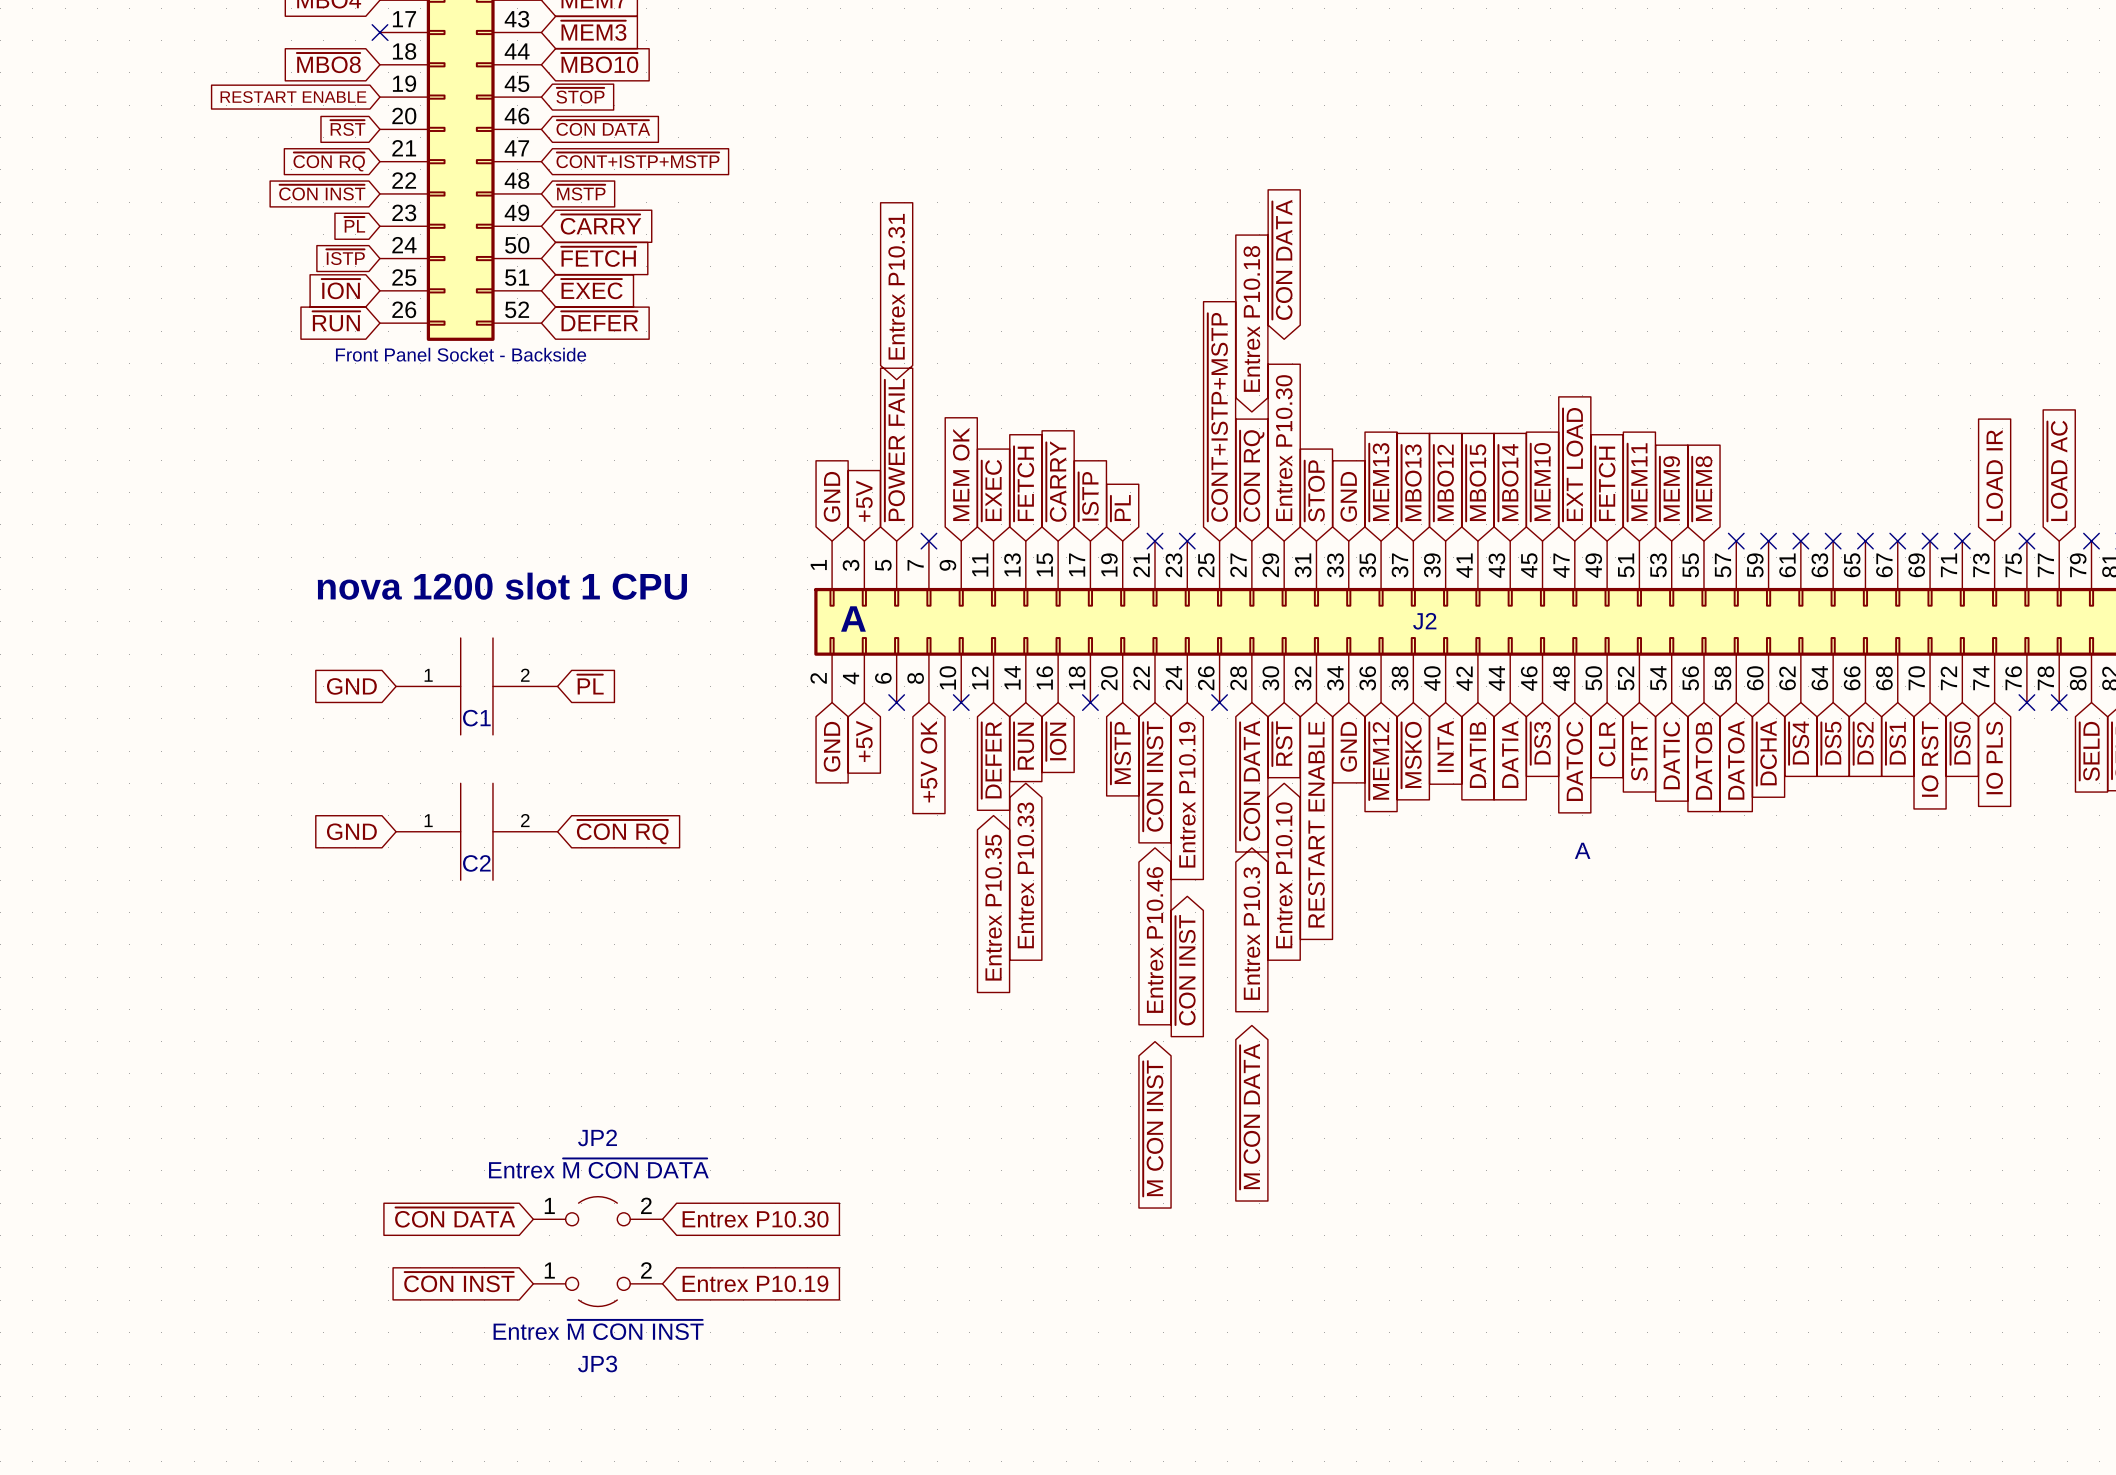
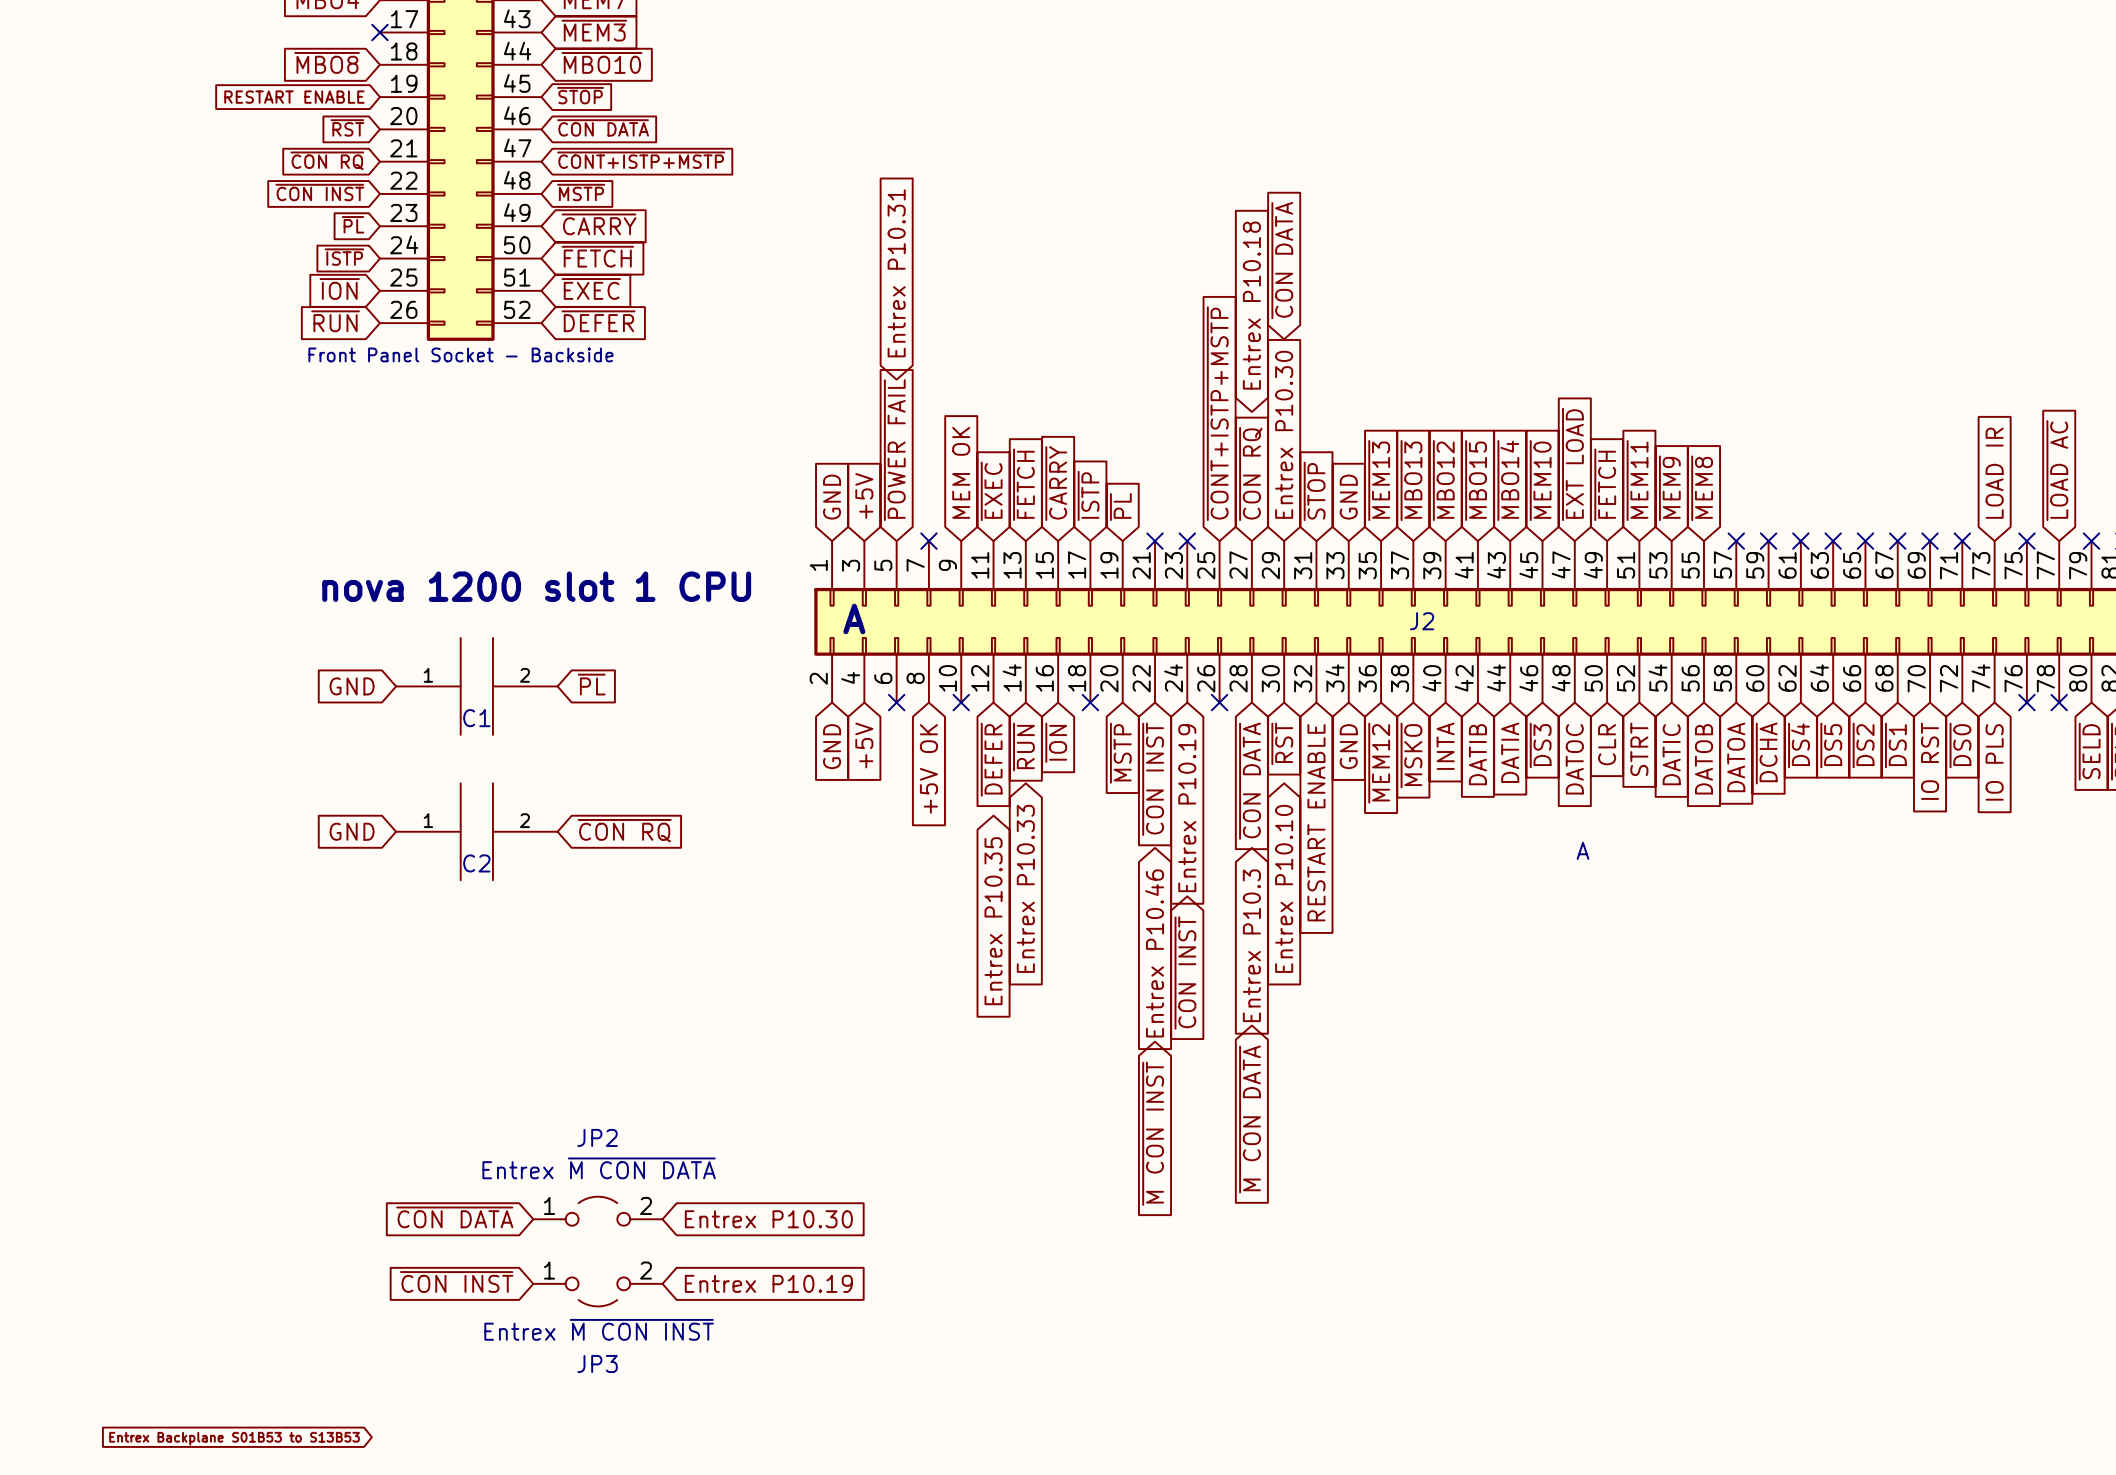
global label: none -> Entrex Backplane S01B53 to S13B53 (234, 1438)

